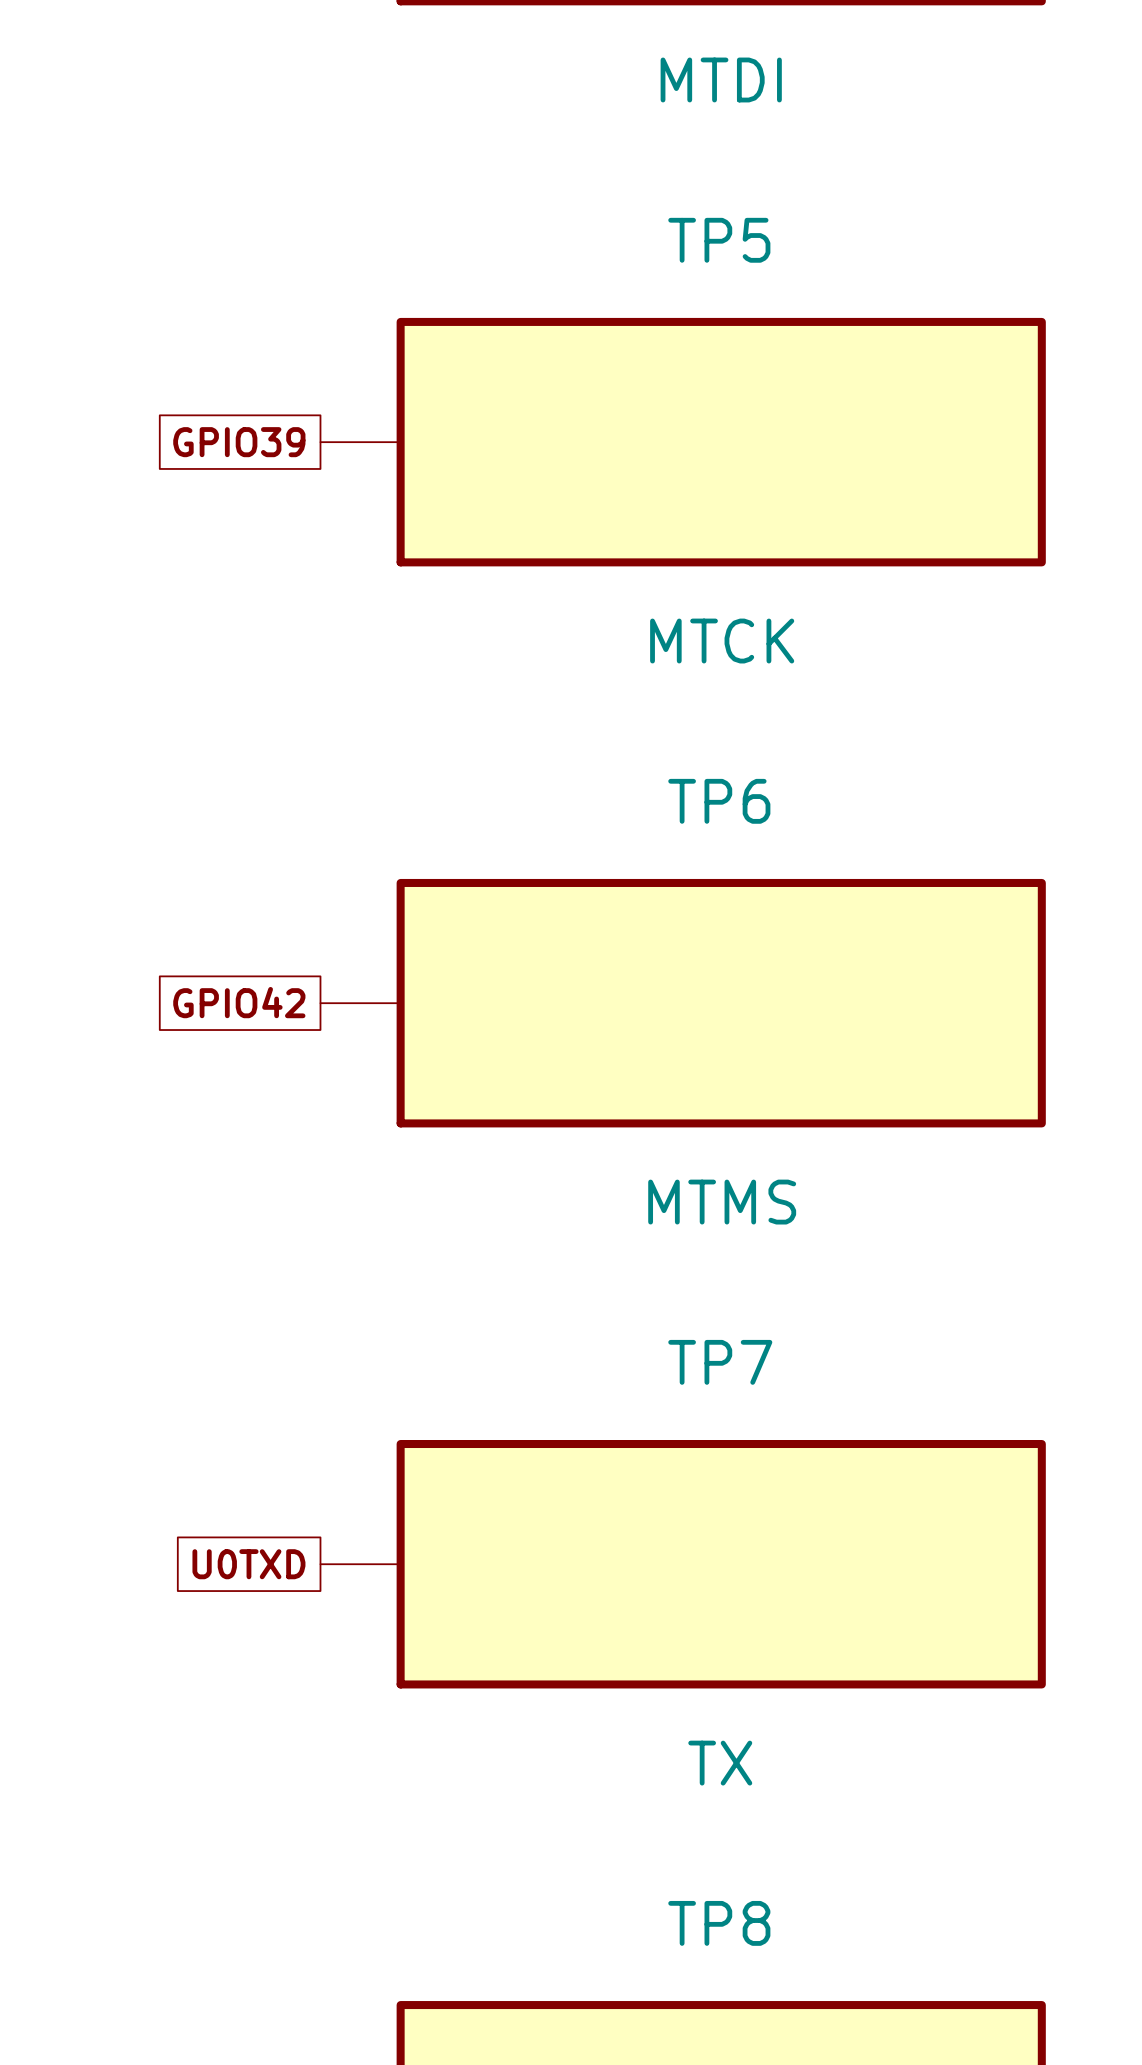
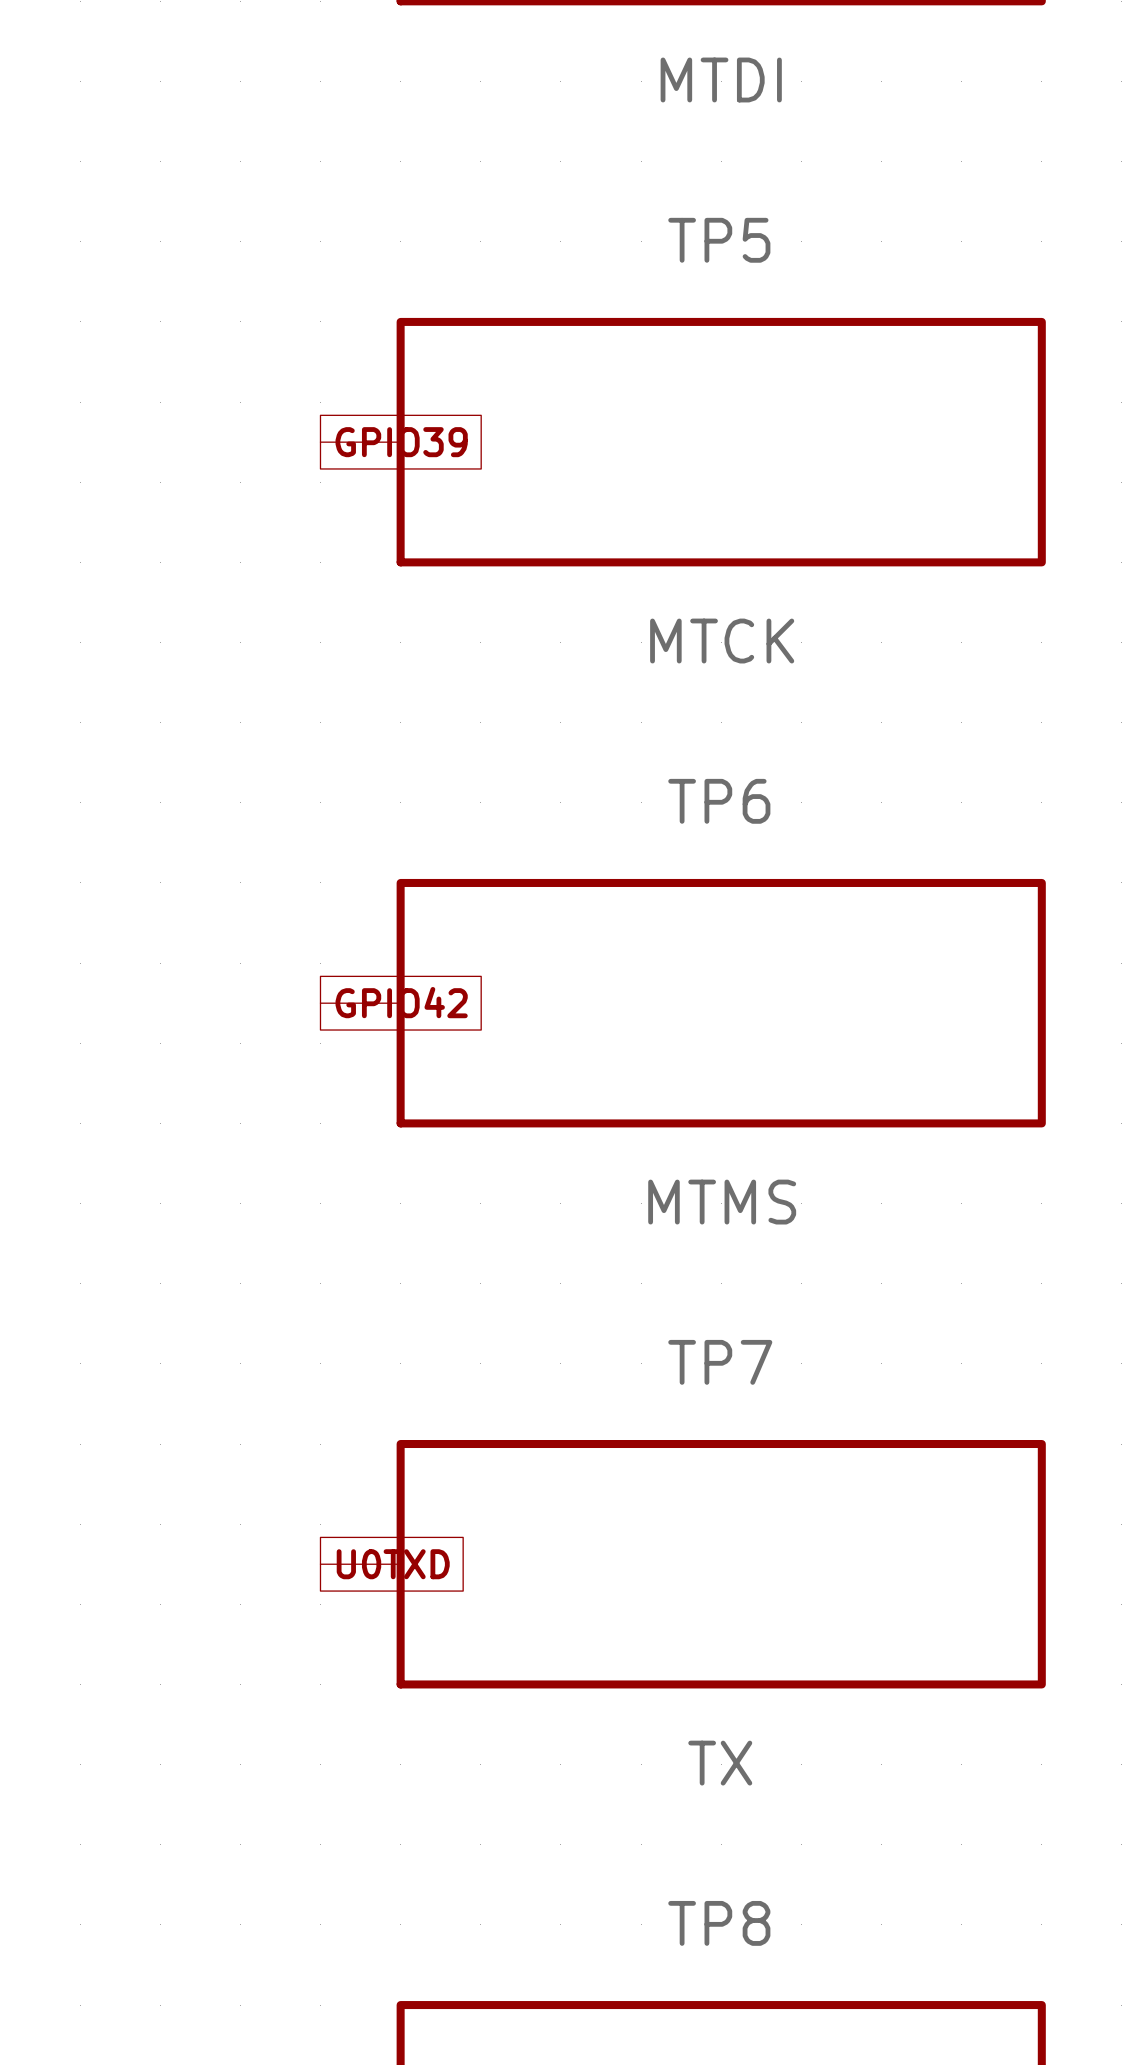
global label rotation: 0° (239, 442) -> 180° (401, 442)
global label rotation: 0° (239, 1002) -> 180° (401, 1002)
global label rotation: 0° (248, 1564) -> 180° (393, 1564)

